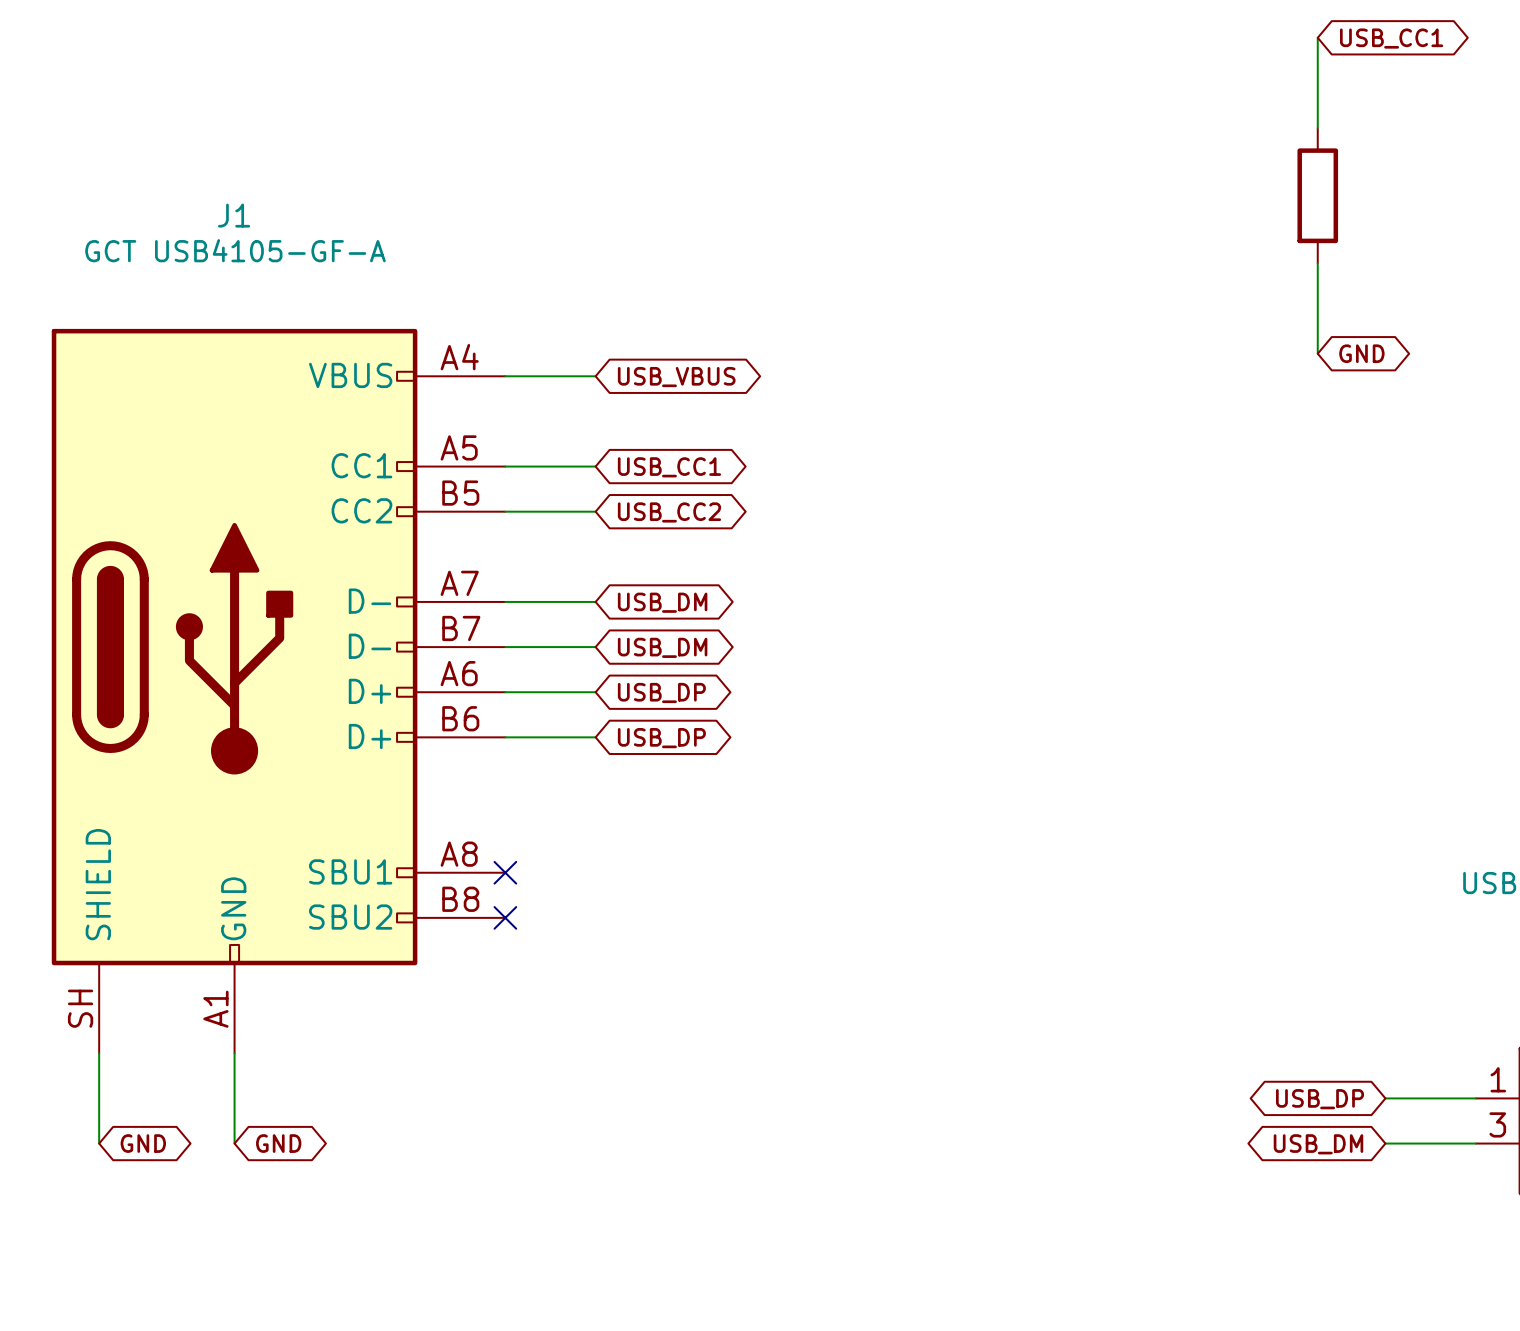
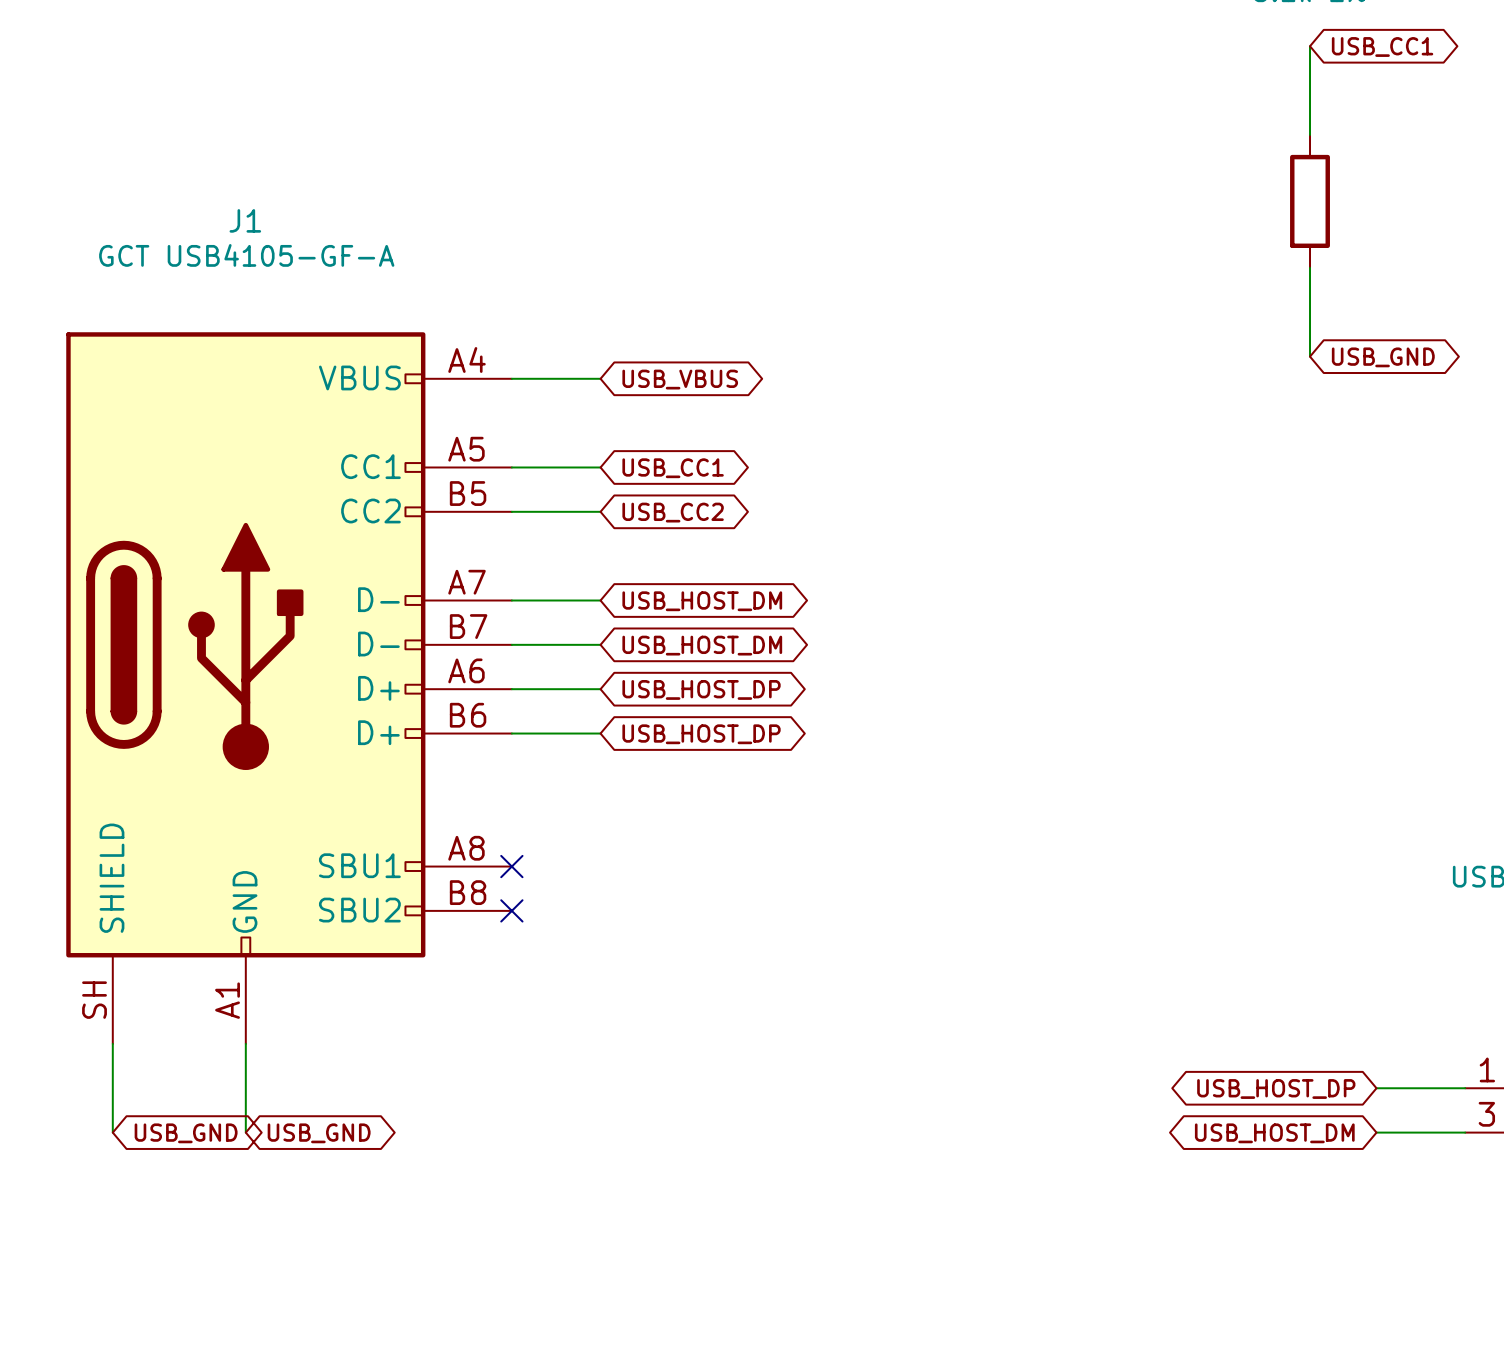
global label: GND (1361, 353) -> USB_GND (1383, 357)
global label: USB_DM (662, 602) -> USB_HOST_DM (702, 601)
global label: USB_DM (662, 647) -> USB_HOST_DM (702, 645)
global label: USB_DP (661, 692) -> USB_HOST_DP (701, 689)
global label: USB_DP (661, 738) -> USB_HOST_DP (701, 734)
global label: USB_DP (1320, 1099) -> USB_HOST_DP (1276, 1089)
global label: GND (143, 1143) -> USB_GND (186, 1133)
global label: GND (278, 1143) -> USB_GND (319, 1133)
global label: USB_DM (1318, 1144) -> USB_HOST_DM (1274, 1133)

